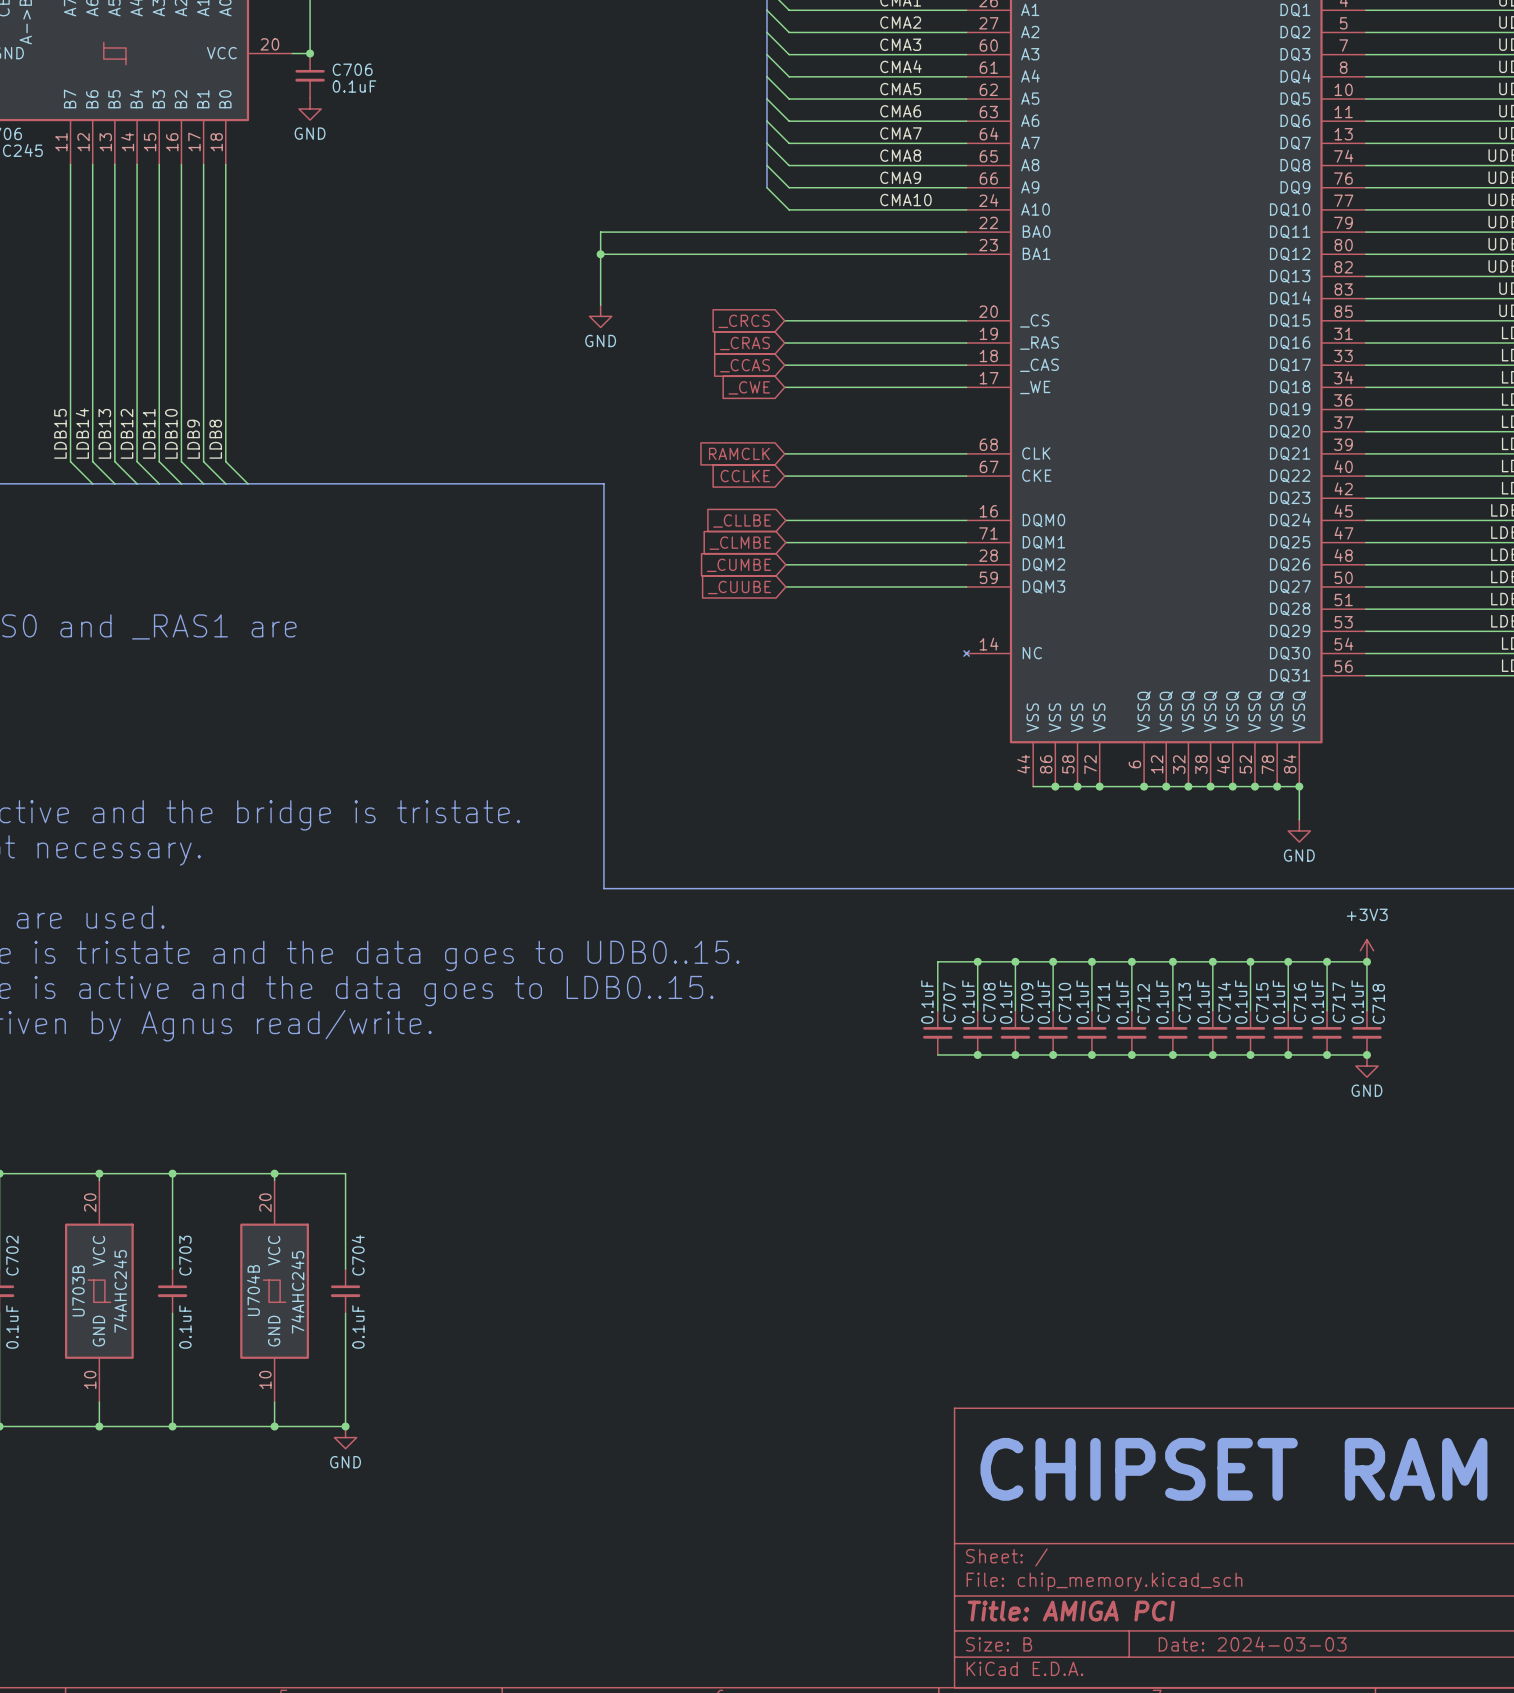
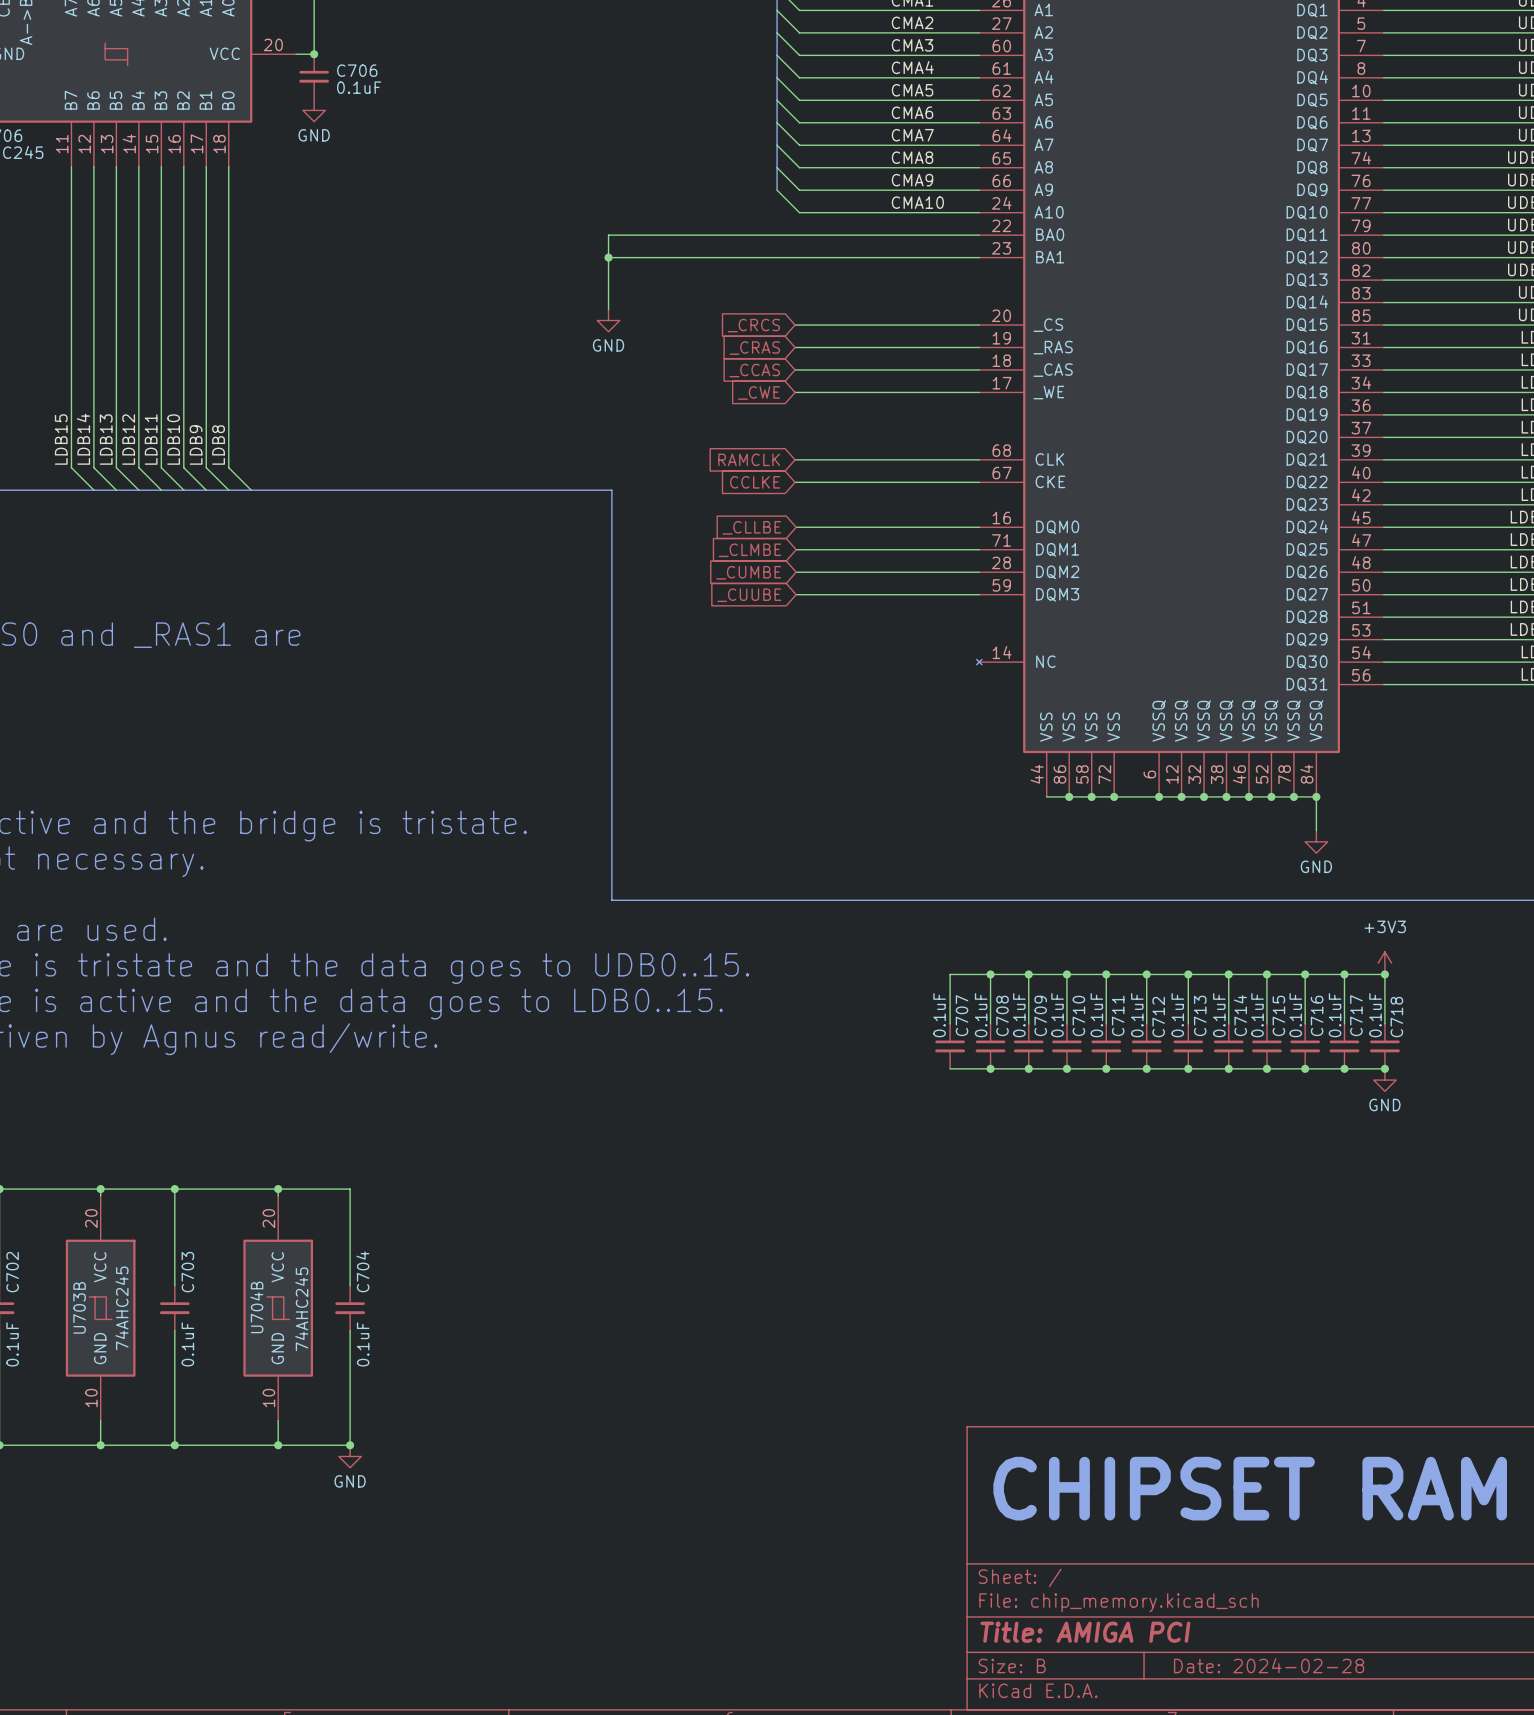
title block: Date: 2024-03-03 (1252, 1644) -> Date: 2024-02-28 (1269, 1665)

